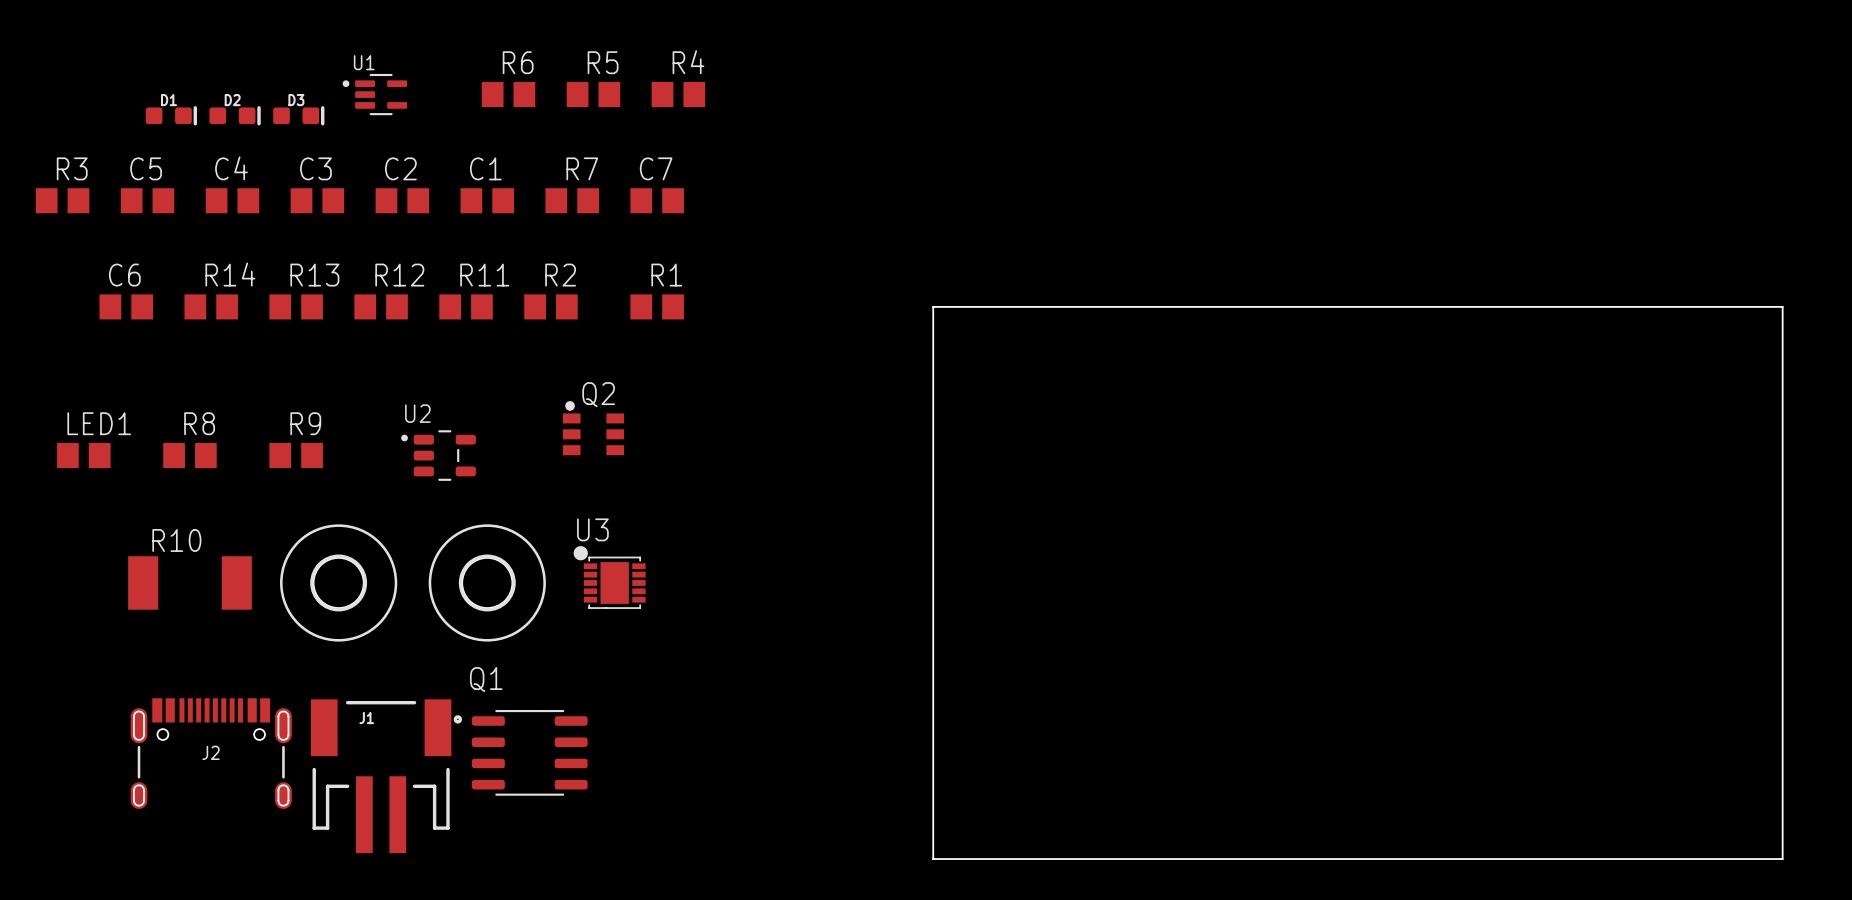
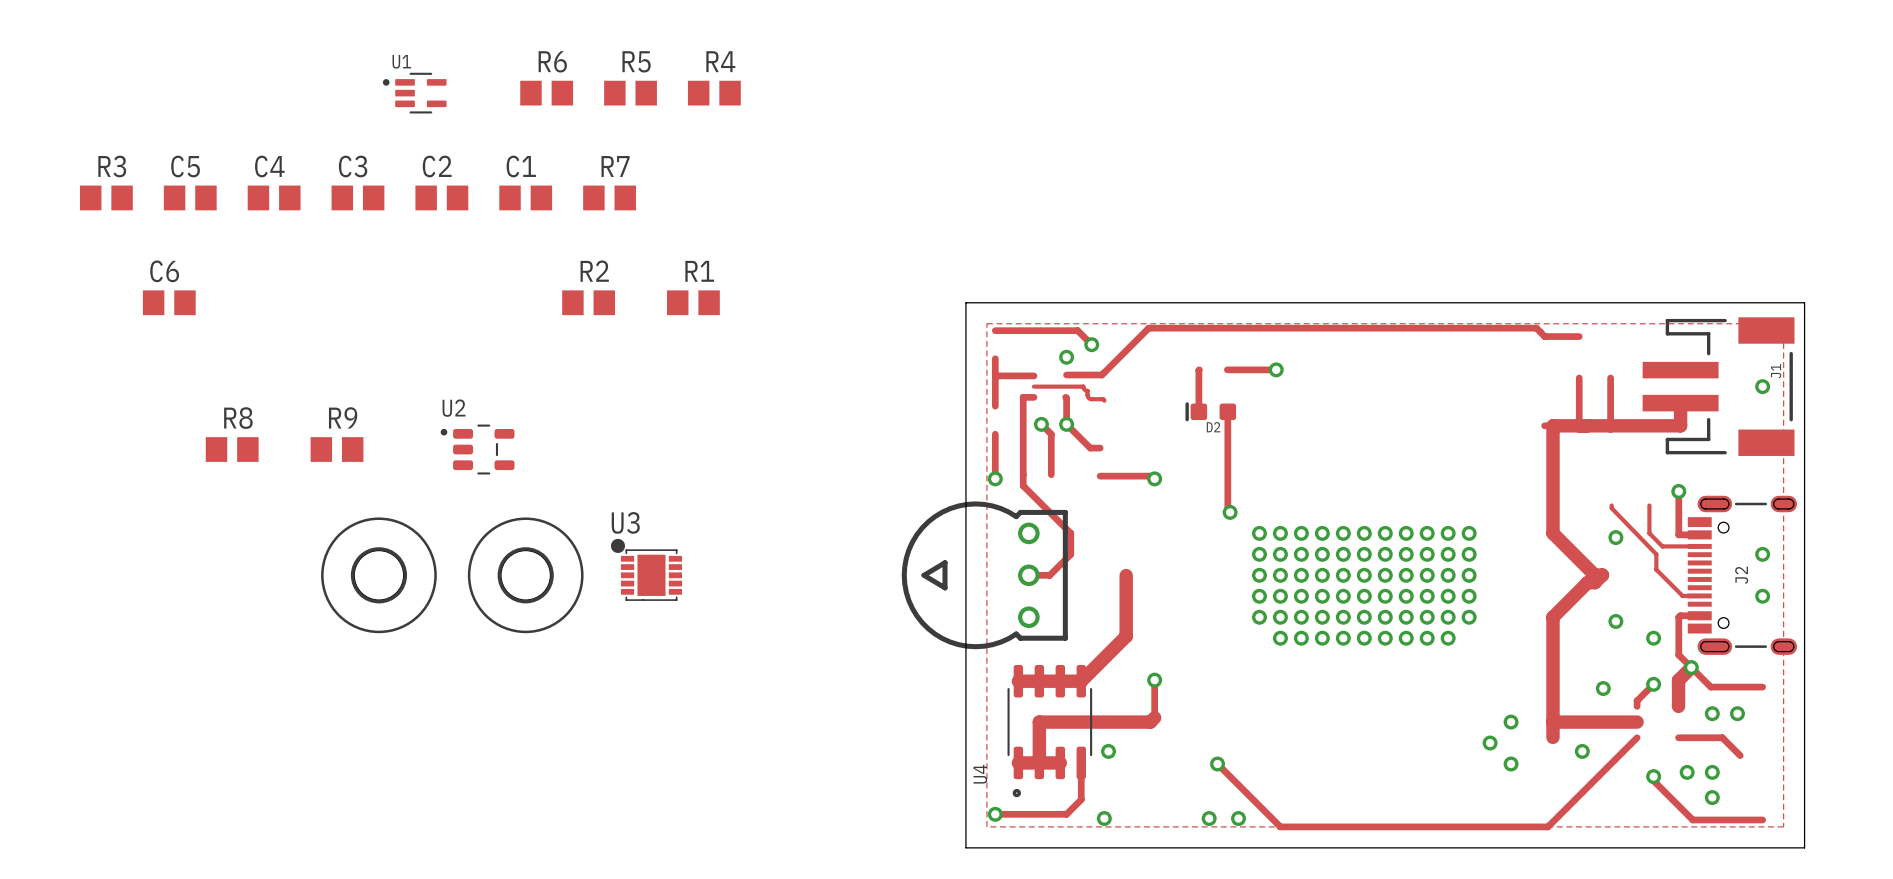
D1: (171, 115) -> none
D2 rotation: 0° (235, 115) -> 180° (1210, 411)
D2 position: (235, 115) -> (1210, 411)
D3: (298, 115) -> none
C7: (657, 200) -> none
R14: (211, 306) -> none
R13: (296, 306) -> none
R12: (381, 306) -> none
R11: (466, 306) -> none
zone outline: none -> (986, 323) (1783, 323) (1783, 826) (986, 826) (986, 323)
track: none -> (995, 330) (1077, 330) (1091, 344)
track: none -> (1579, 336) (1544, 336) (1536, 328) (1148, 328) (1101, 374) (1066, 374)
via: none -> (1091, 344)
via: none -> (1066, 357)
track: none -> (995, 358) (995, 406)
track: none -> (1199, 369) (1198, 411)
track: none -> (1227, 369) (1276, 369)
via: none -> (1276, 369)
track: none -> (995, 375) (1033, 375)
track: none -> (1579, 378) (1579, 425) (1544, 425)
track: none -> (1610, 378) (1610, 425)
track: none -> (1033, 386) (1083, 386) (1087, 390) (1089, 398) (1104, 400)
via: none -> (1762, 386)
track: none -> (1033, 397) (1023, 397) (1023, 485) (1070, 533) (1070, 554) (1049, 575) (1028, 575)
track: none -> (1065, 397) (1066, 424) (1090, 448) (1100, 448)
track: none -> (1680, 403) (1680, 425) (1552, 425) (1552, 533) (1594, 575) (1602, 575) (1594, 582) (1587, 582) (1552, 617) (1552, 737)
track: none -> (1227, 411) (1227, 510) (1230, 512)
Q2: (593, 428) -> none
track: none -> (1041, 424) (1051, 434) (1051, 474)
via: none -> (1041, 424)
via: none -> (1066, 424)
track: none -> (995, 434) (995, 478)
LED1: (83, 455) -> none
track: none -> (1100, 476) (1154, 476) (1154, 478)
via: none -> (995, 478)
via: none -> (1154, 478)
track: none -> (1678, 491) (1678, 534) (1699, 534)
via: none -> (1678, 491)
track: none -> (1611, 505) (1611, 508) (1656, 554) (1656, 569) (1682, 595) (1699, 595)
track: none -> (1649, 505) (1649, 533) (1662, 546) (1699, 546)
via: none -> (1230, 512)
via: none -> (1259, 533)
via: none -> (1280, 533)
via: none -> (1301, 533)
via: none -> (1322, 533)
via: none -> (1343, 533)
via: none -> (1364, 533)
via: none -> (1385, 533)
via: none -> (1406, 533)
via: none -> (1427, 533)
via: none -> (1448, 533)
via: none -> (1469, 533)
via: none -> (1615, 537)
via: none -> (1259, 554)
via: none -> (1280, 554)
via: none -> (1301, 554)
via: none -> (1322, 554)
via: none -> (1343, 554)
via: none -> (1364, 554)
via: none -> (1385, 554)
via: none -> (1406, 554)
via: none -> (1427, 554)
via: none -> (1448, 554)
via: none -> (1469, 554)
via: none -> (1762, 554)
R10: (189, 582) -> none
part: none -> (984, 575)
via: none -> (1259, 575)
via: none -> (1280, 575)
via: none -> (1301, 575)
via: none -> (1322, 575)
via: none -> (1343, 575)
via: none -> (1364, 575)
via: none -> (1385, 575)
via: none -> (1406, 575)
via: none -> (1427, 575)
via: none -> (1448, 575)
via: none -> (1469, 575)
track: none -> (1126, 575) (1126, 636) (1081, 681) (1018, 681)
via: none -> (1259, 596)
via: none -> (1280, 596)
via: none -> (1301, 596)
via: none -> (1322, 596)
via: none -> (1343, 596)
via: none -> (1364, 596)
via: none -> (1385, 596)
via: none -> (1406, 596)
via: none -> (1427, 596)
via: none -> (1448, 596)
via: none -> (1469, 596)
via: none -> (1762, 596)
track: none -> (1699, 615) (1678, 617) (1678, 654) (1710, 687) (1762, 687)
via: none -> (1259, 617)
via: none -> (1280, 617)
via: none -> (1301, 617)
via: none -> (1322, 617)
via: none -> (1343, 617)
via: none -> (1364, 617)
via: none -> (1385, 617)
via: none -> (1406, 617)
via: none -> (1427, 617)
via: none -> (1448, 617)
via: none -> (1469, 617)
via: none -> (1615, 621)
via: none -> (1280, 638)
via: none -> (1301, 638)
via: none -> (1322, 638)
via: none -> (1343, 638)
via: none -> (1364, 638)
via: none -> (1385, 638)
via: none -> (1406, 638)
via: none -> (1427, 638)
via: none -> (1448, 638)
via: none -> (1653, 638)
track: none -> (1691, 667) (1678, 680) (1678, 706)
via: none -> (1691, 667)
track: none -> (1154, 680) (1154, 717) (1150, 722) (1039, 722) (1039, 762)
via: none -> (1154, 680)
track: none -> (1653, 684) (1637, 700) (1637, 706)
via: none -> (1653, 684)
via: none -> (1603, 688)
via: none -> (1712, 713)
via: none -> (1737, 713)
via: none -> (1511, 722)
track: none -> (1552, 722) (1637, 722)
U4: none -> (1049, 731)
track: none -> (1637, 737) (1547, 826) (1280, 826) (1217, 764)
track: none -> (1678, 737) (1722, 737) (1740, 755)
Q1: (520, 752) -> none
via: none -> (1490, 743)
J2 rotation: 0° (211, 753) -> 90° counterclockwise (1742, 575)
J2 position: (211, 753) -> (1742, 575)
via: none -> (1108, 751)
via: none -> (1582, 751)
track: none -> (1018, 762) (1060, 762)
track: none -> (1081, 762) (1081, 799) (1066, 814) (995, 814)
via: none -> (1217, 764)
via: none -> (1511, 764)
J1 rotation: 0° (381, 776) -> 90° clockwise (1718, 386)
J1 position: (381, 776) -> (1718, 386)
via: none -> (1687, 772)
via: none -> (1712, 772)
track: none -> (1653, 776) (1653, 780) (1692, 819) (1762, 819)
via: none -> (1653, 776)
via: none -> (1712, 797)
via: none -> (995, 814)
via: none -> (1104, 818)
via: none -> (1209, 818)
via: none -> (1238, 818)

